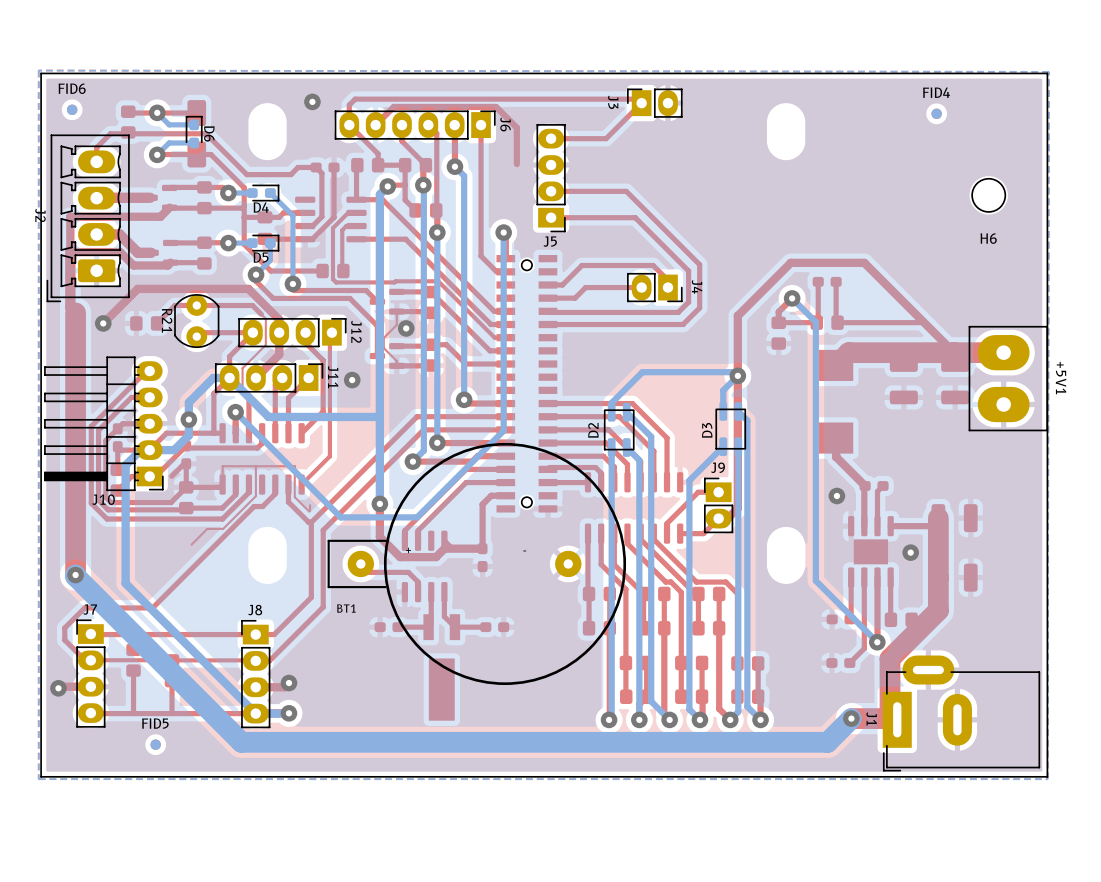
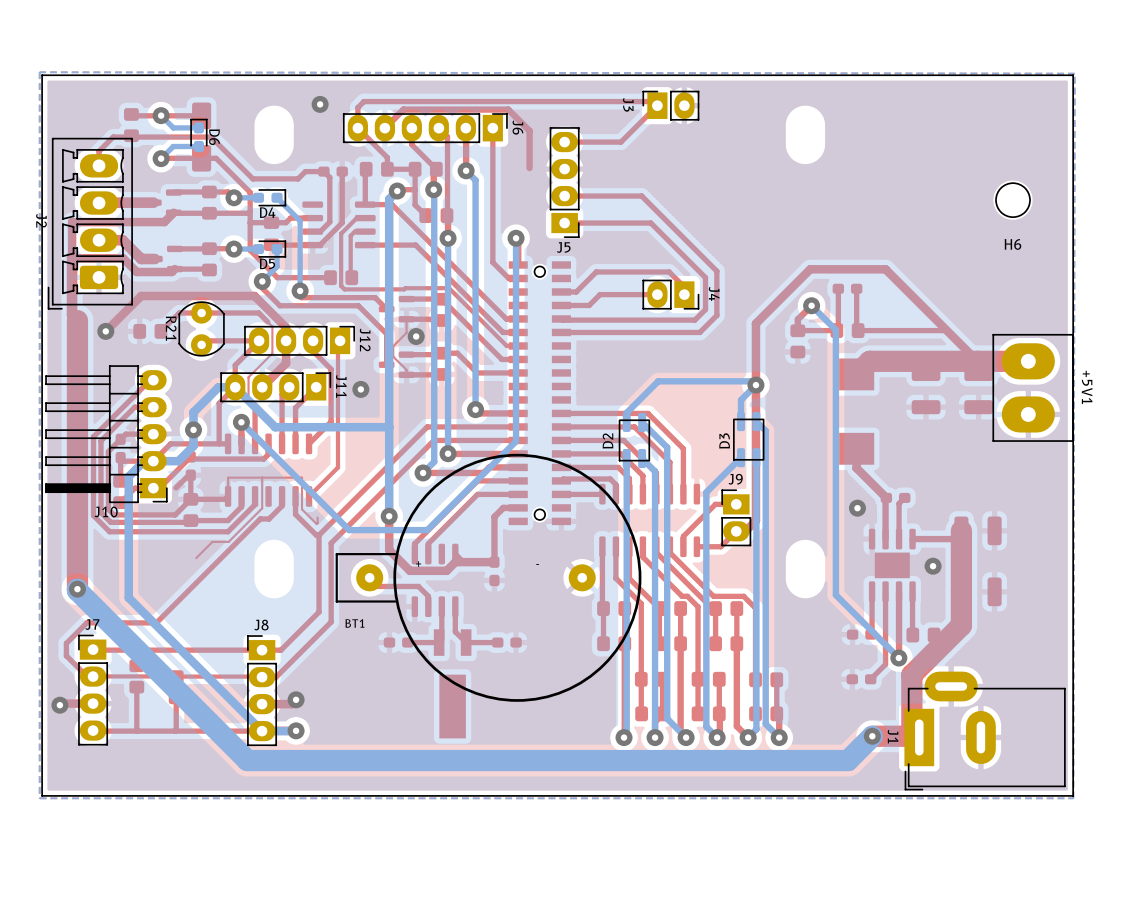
FID6: (72, 109) -> none
FID4: (936, 113) -> none
FID5: (155, 744) -> none

